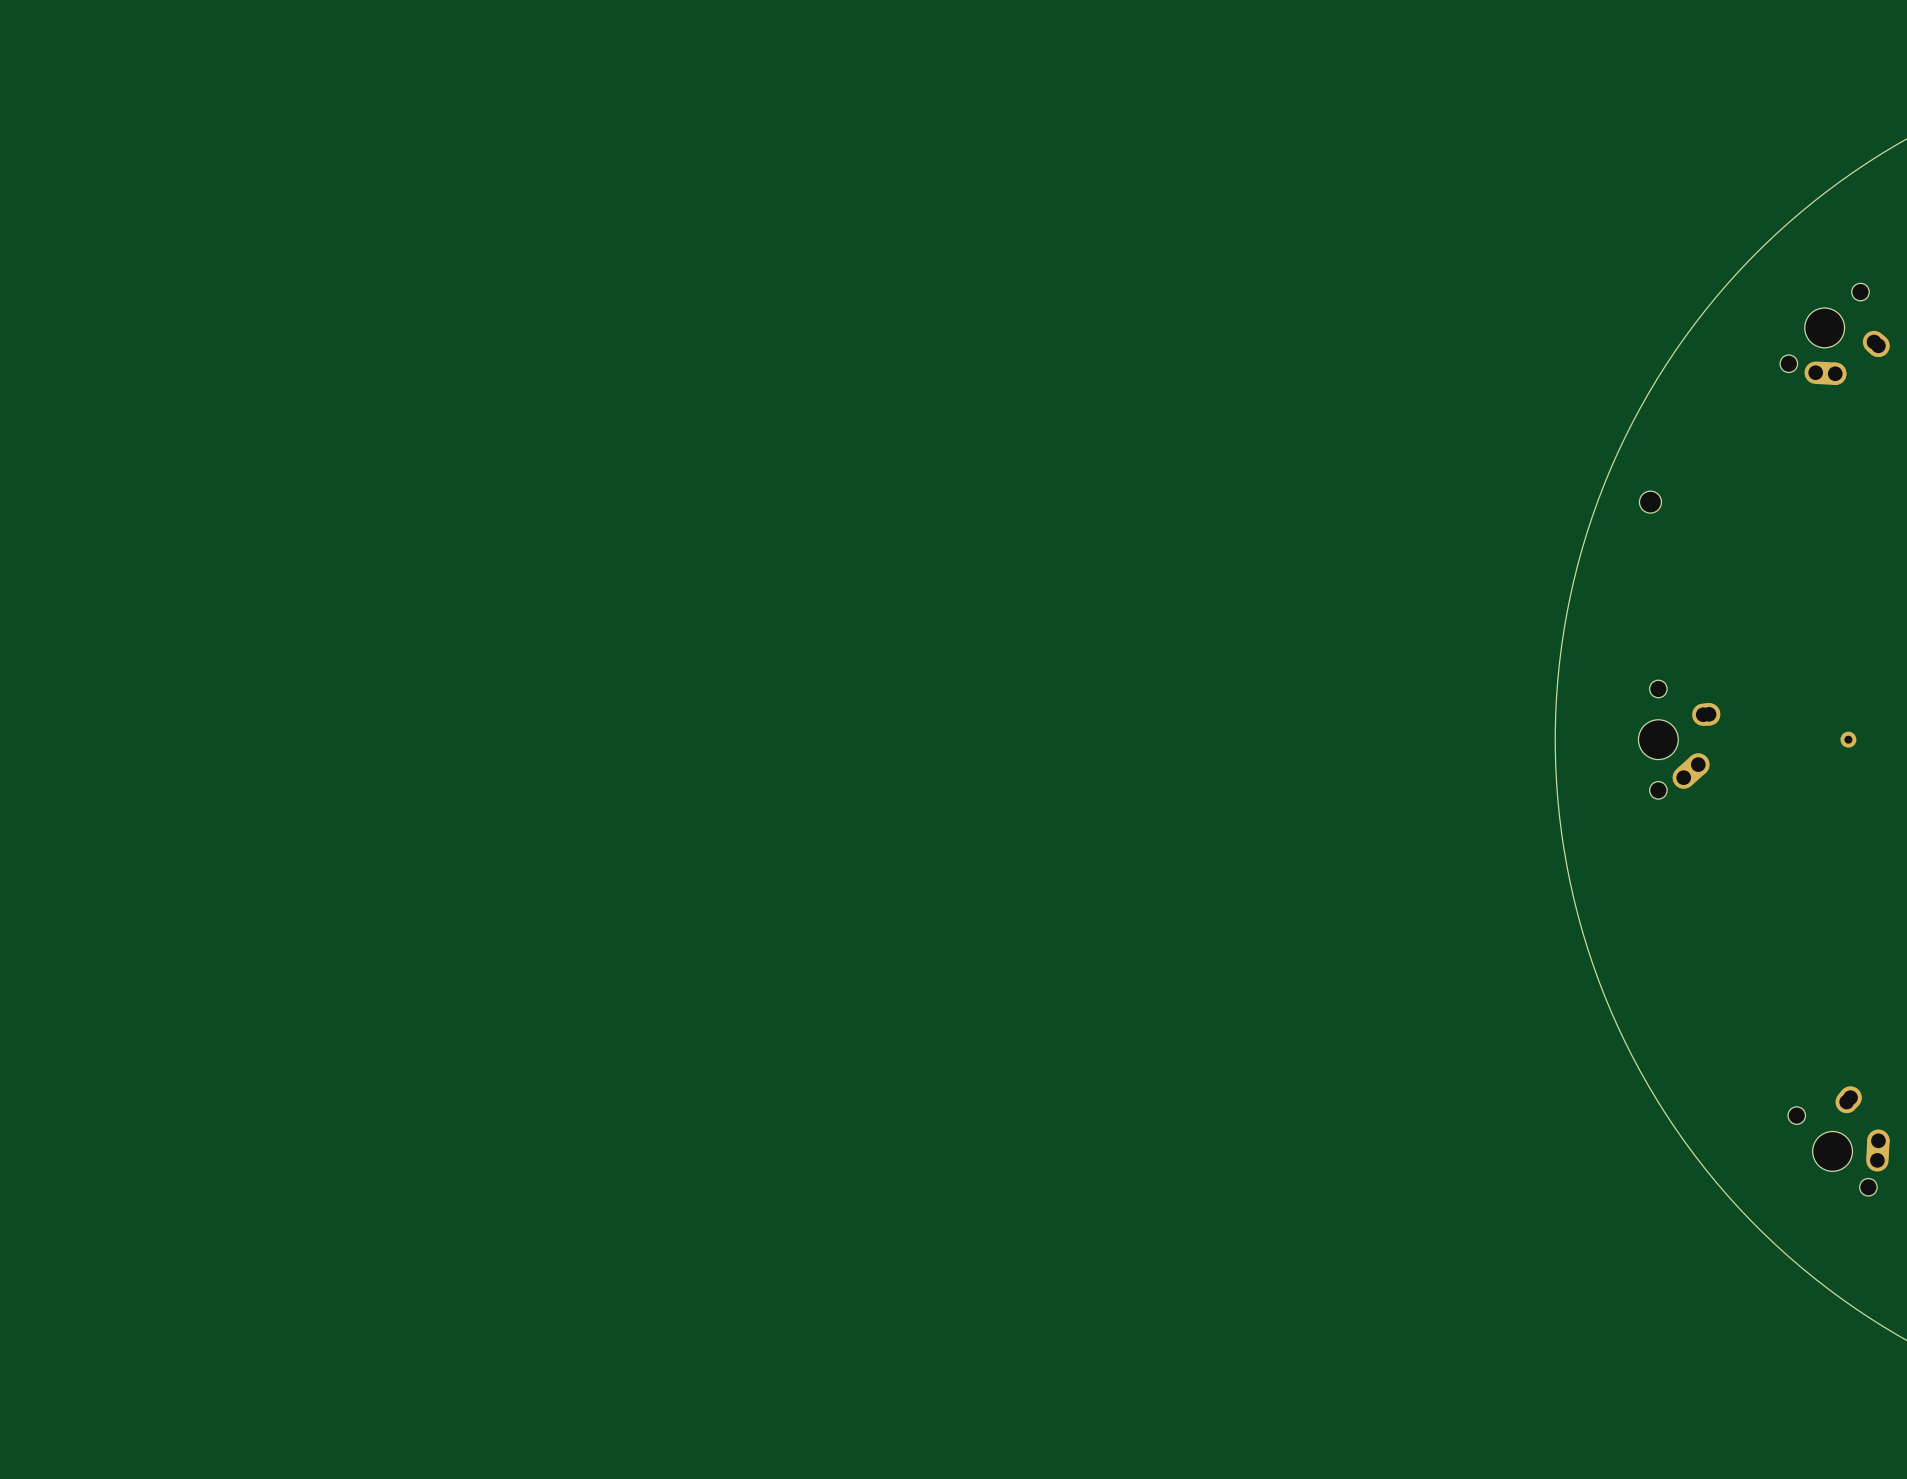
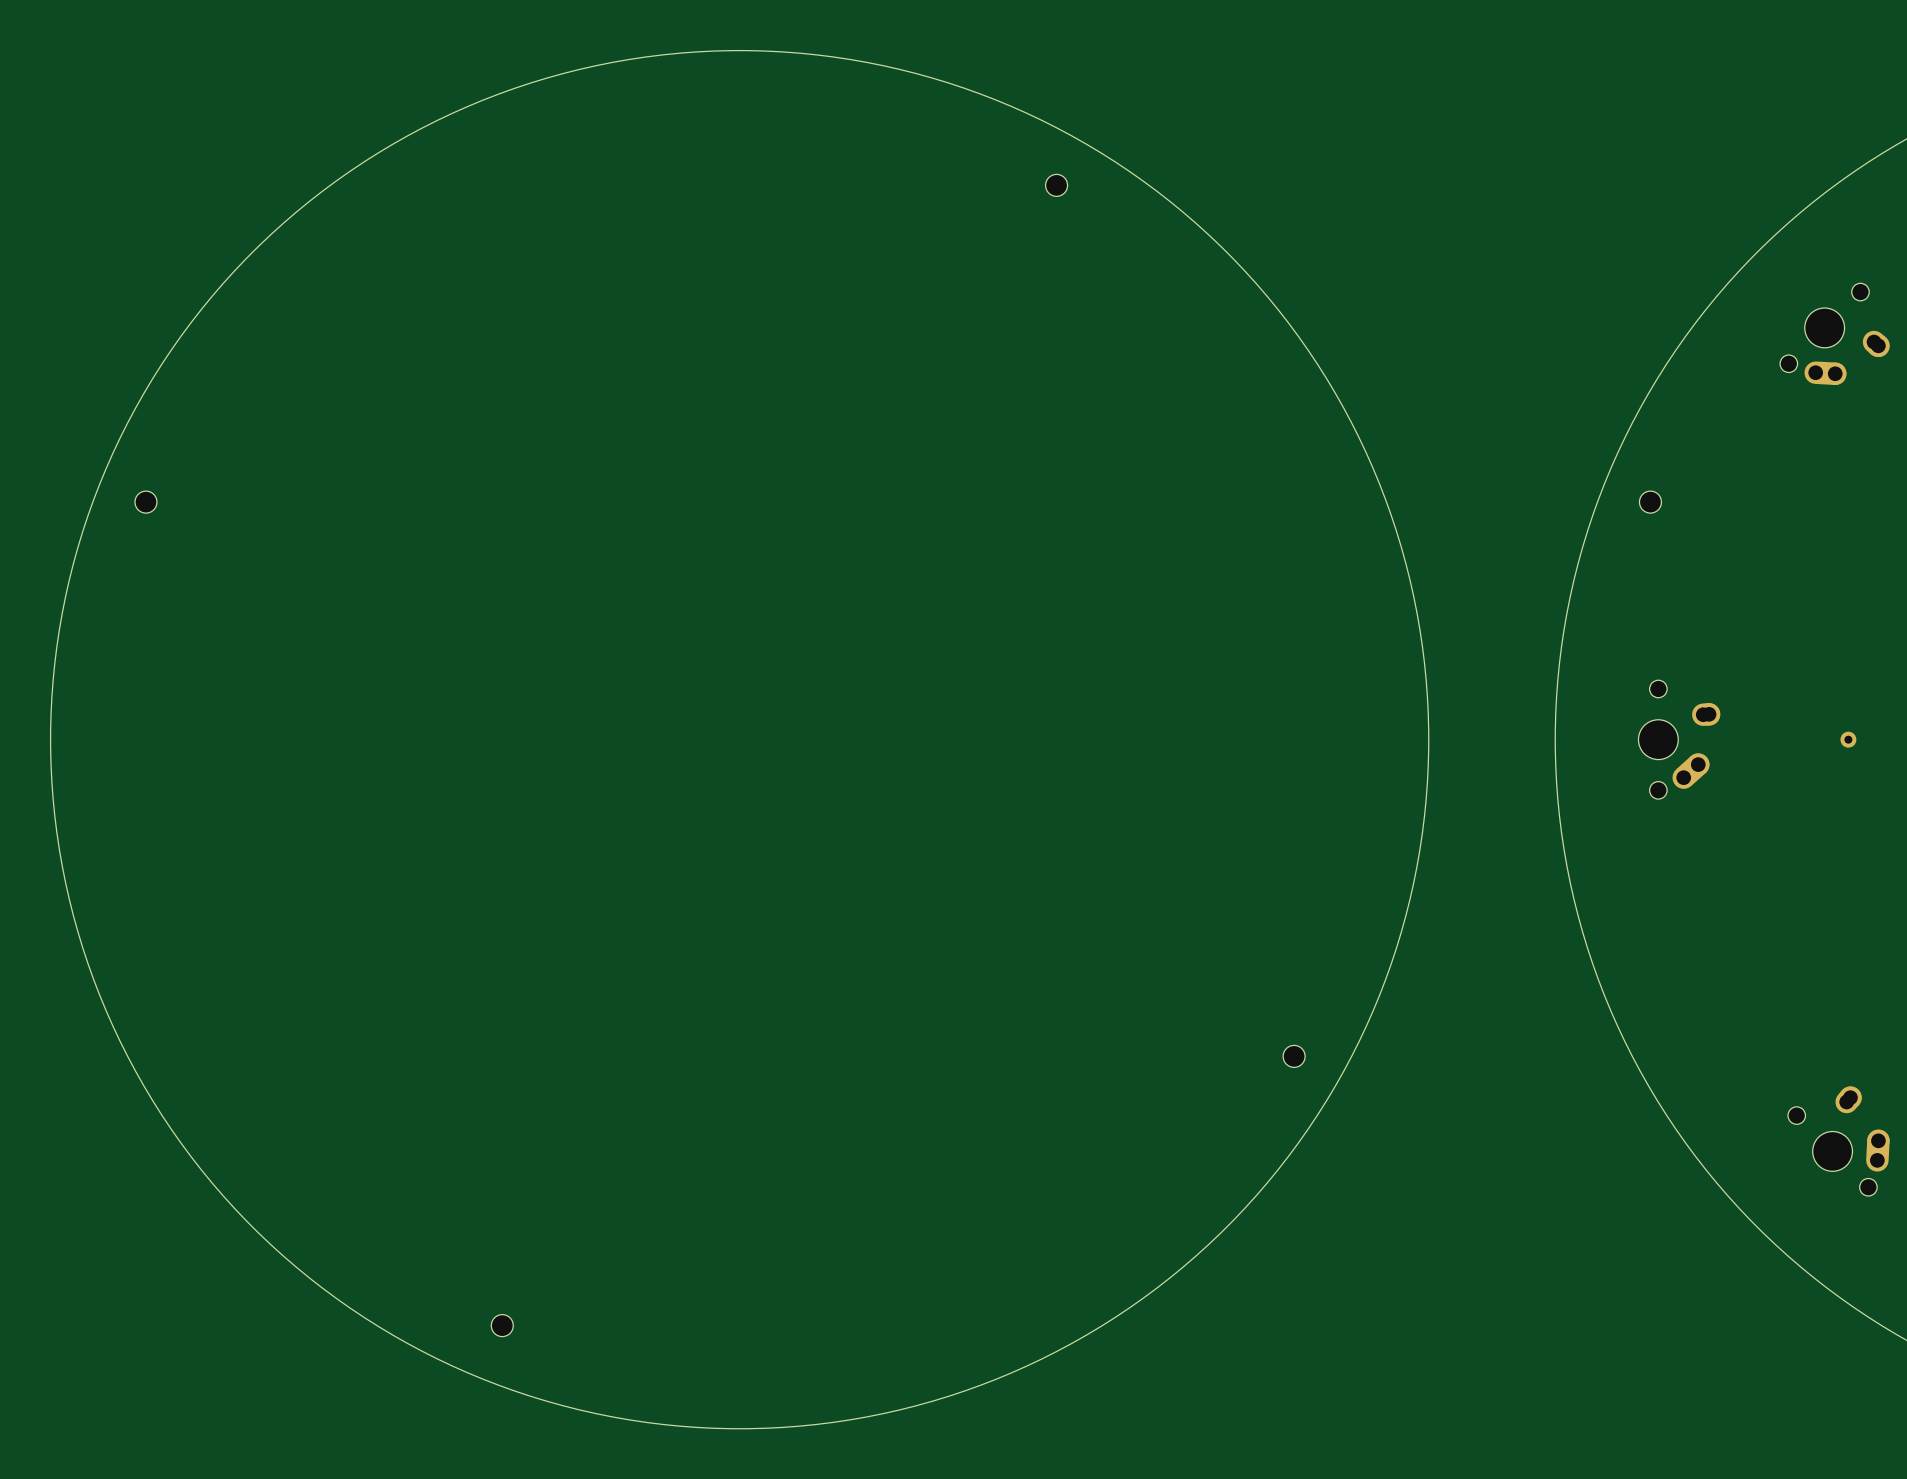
round board edge: none -> [50, 50, 1429, 1429]
part: none -> (1056, 185)
part: none -> (145, 502)
part: none -> (1294, 1056)
part: none -> (502, 1325)

